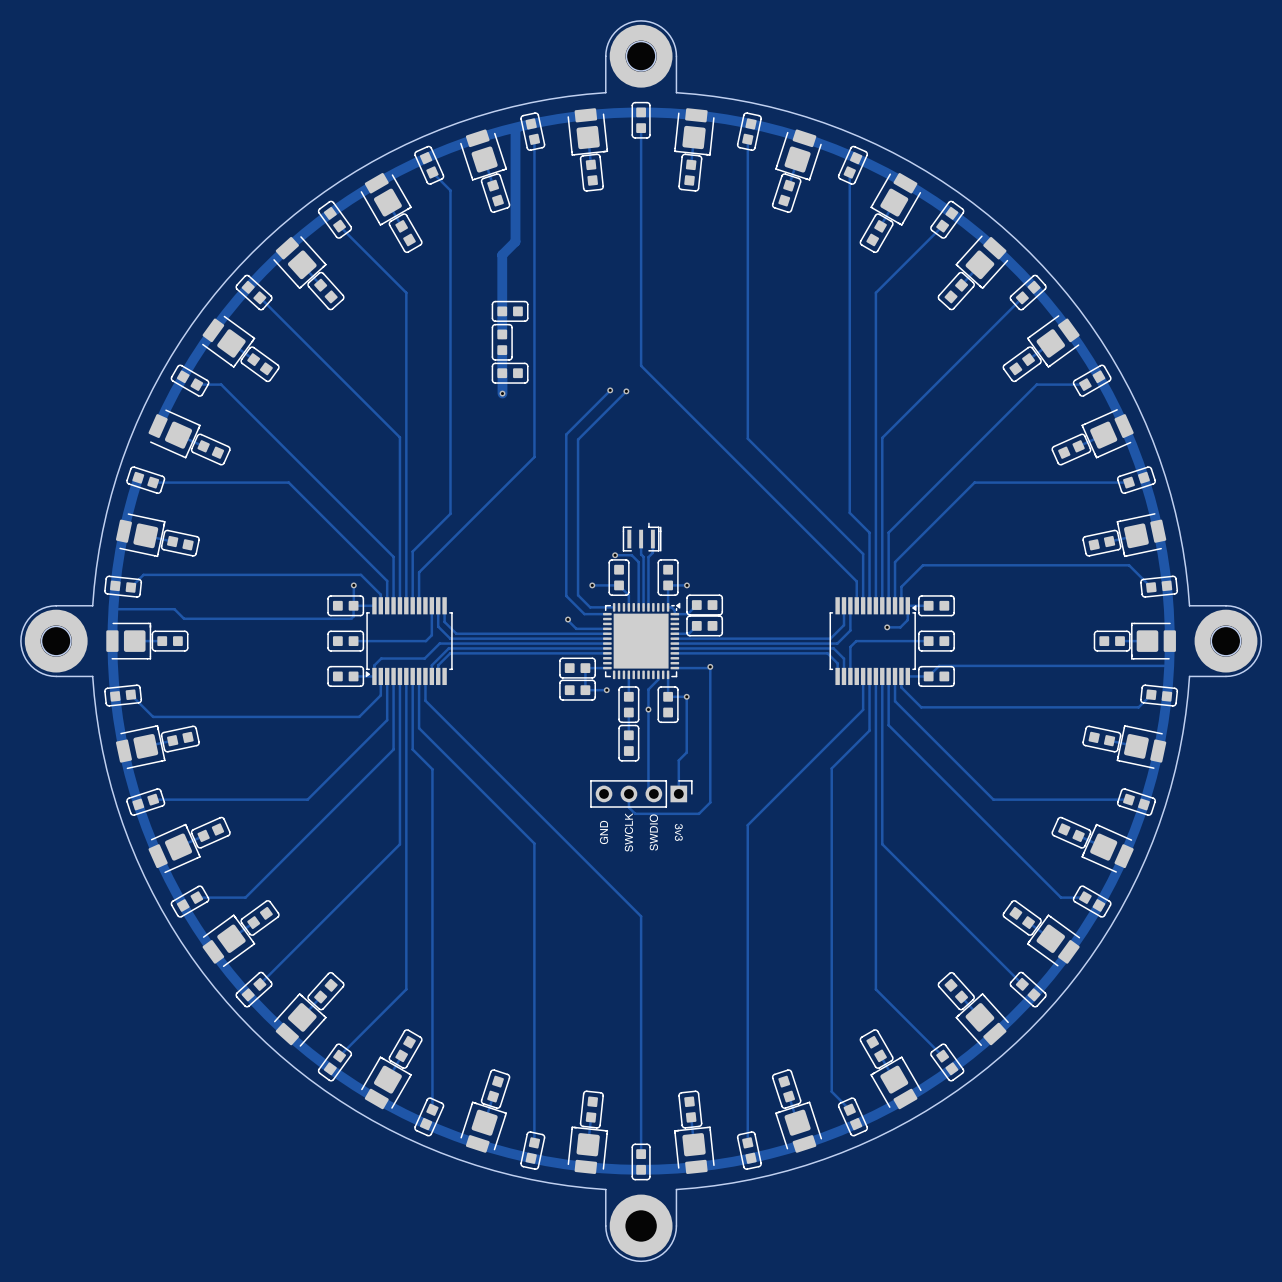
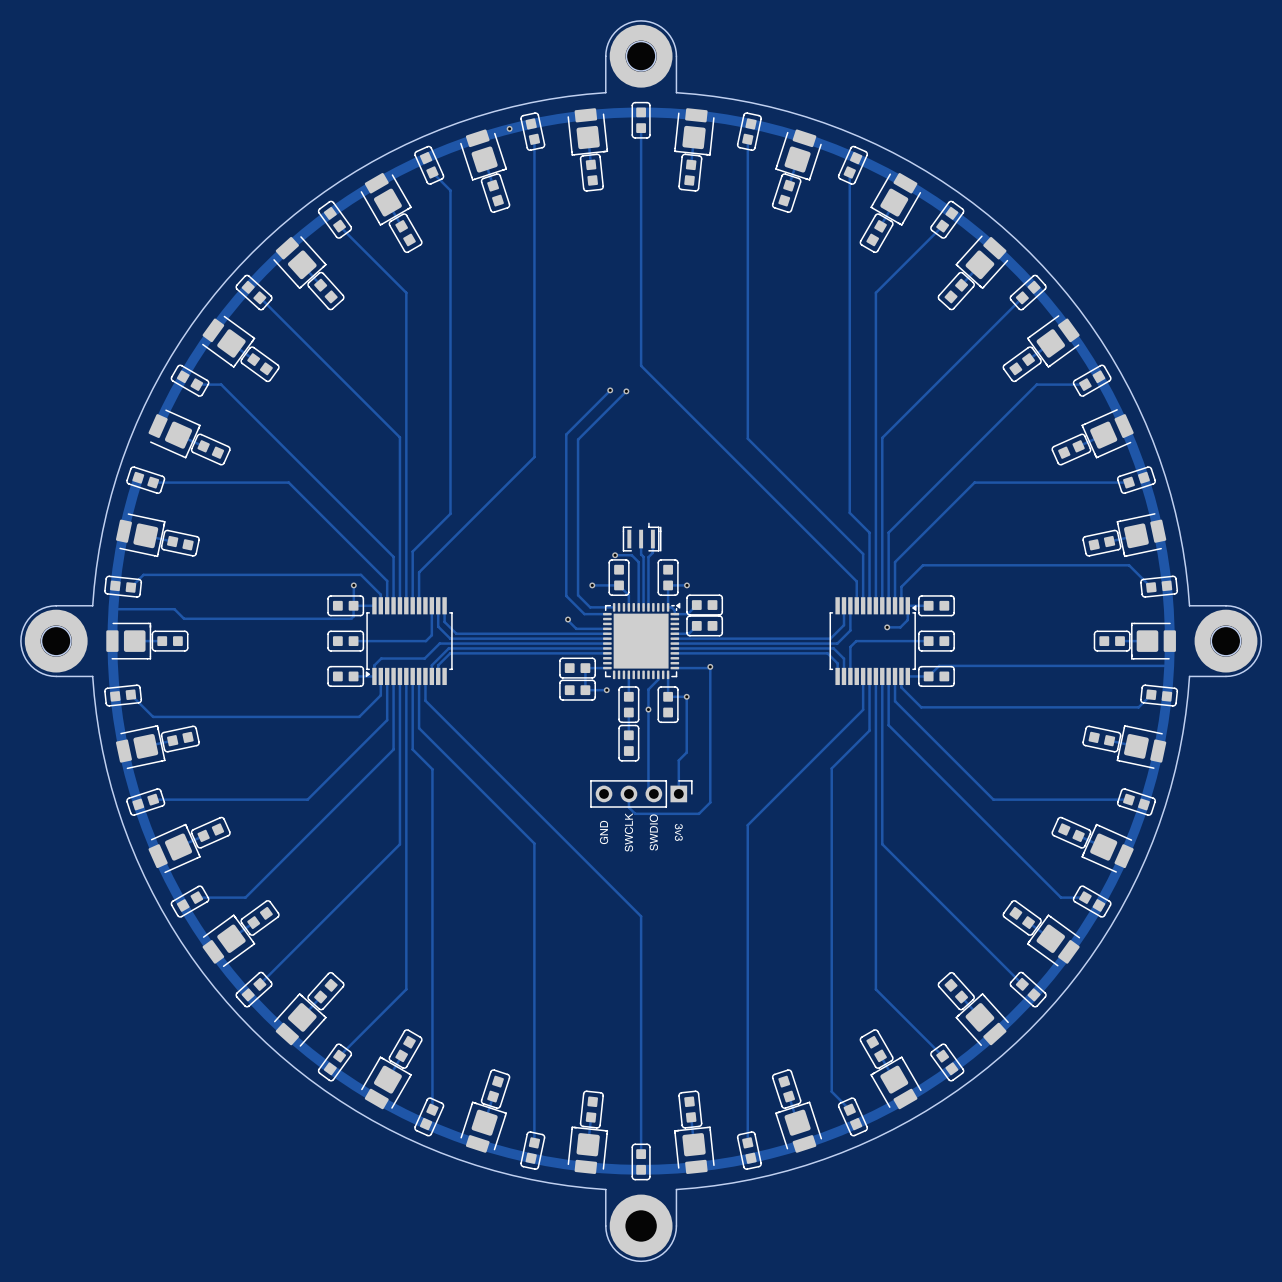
via: none -> (509, 128)
track: (515, 130) (515, 241) (502, 254) (502, 334) -> none
part: (510, 311) -> none
part: (502, 342) -> none
track: (502, 350) (502, 393) -> none
part: (510, 373) -> none
via: (502, 393) -> none

